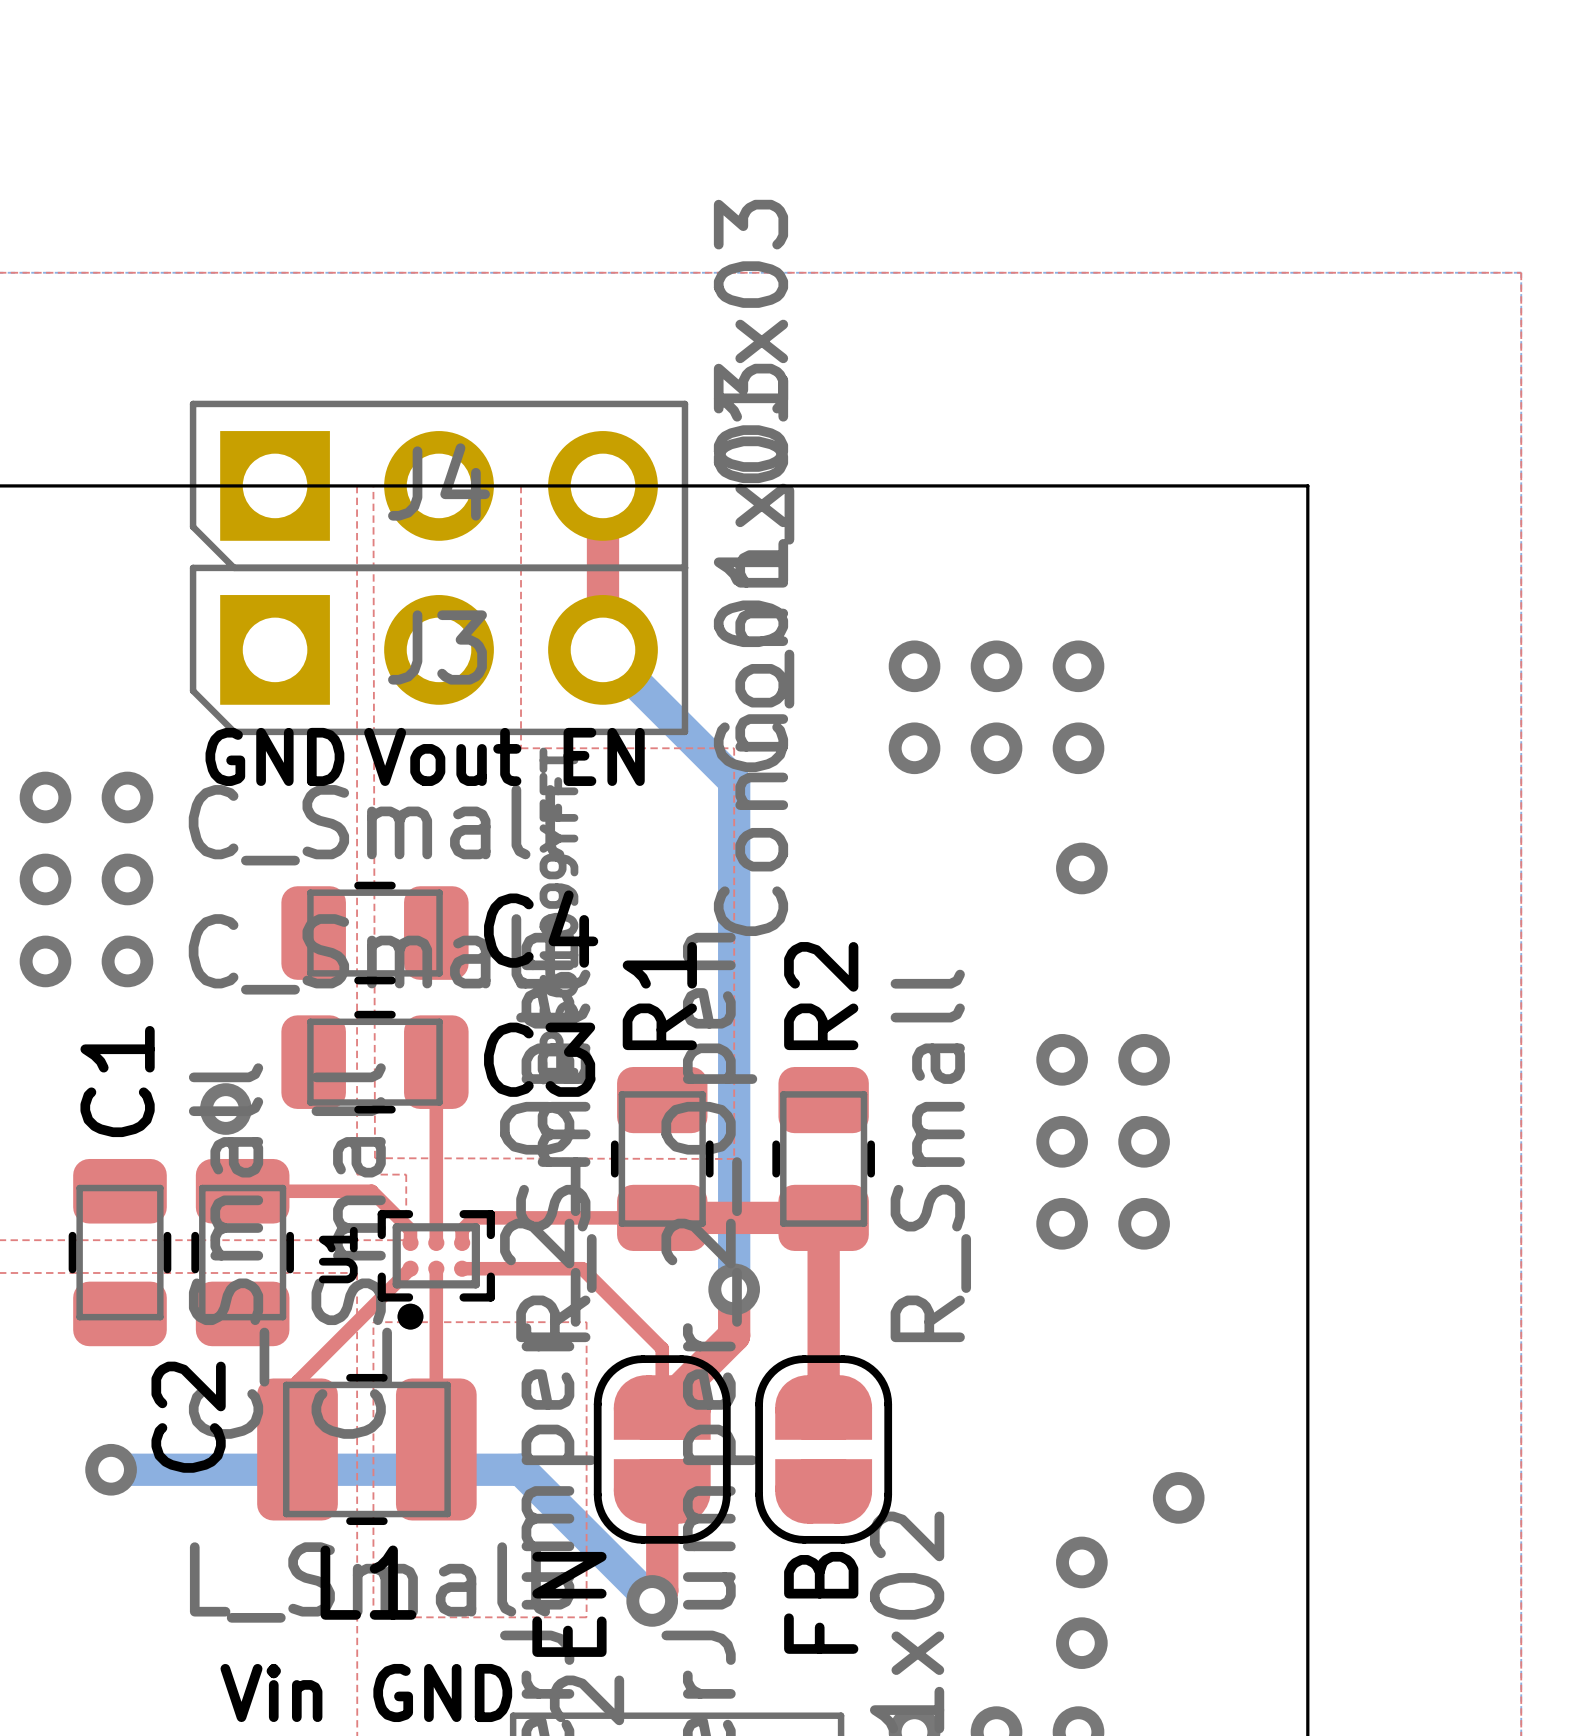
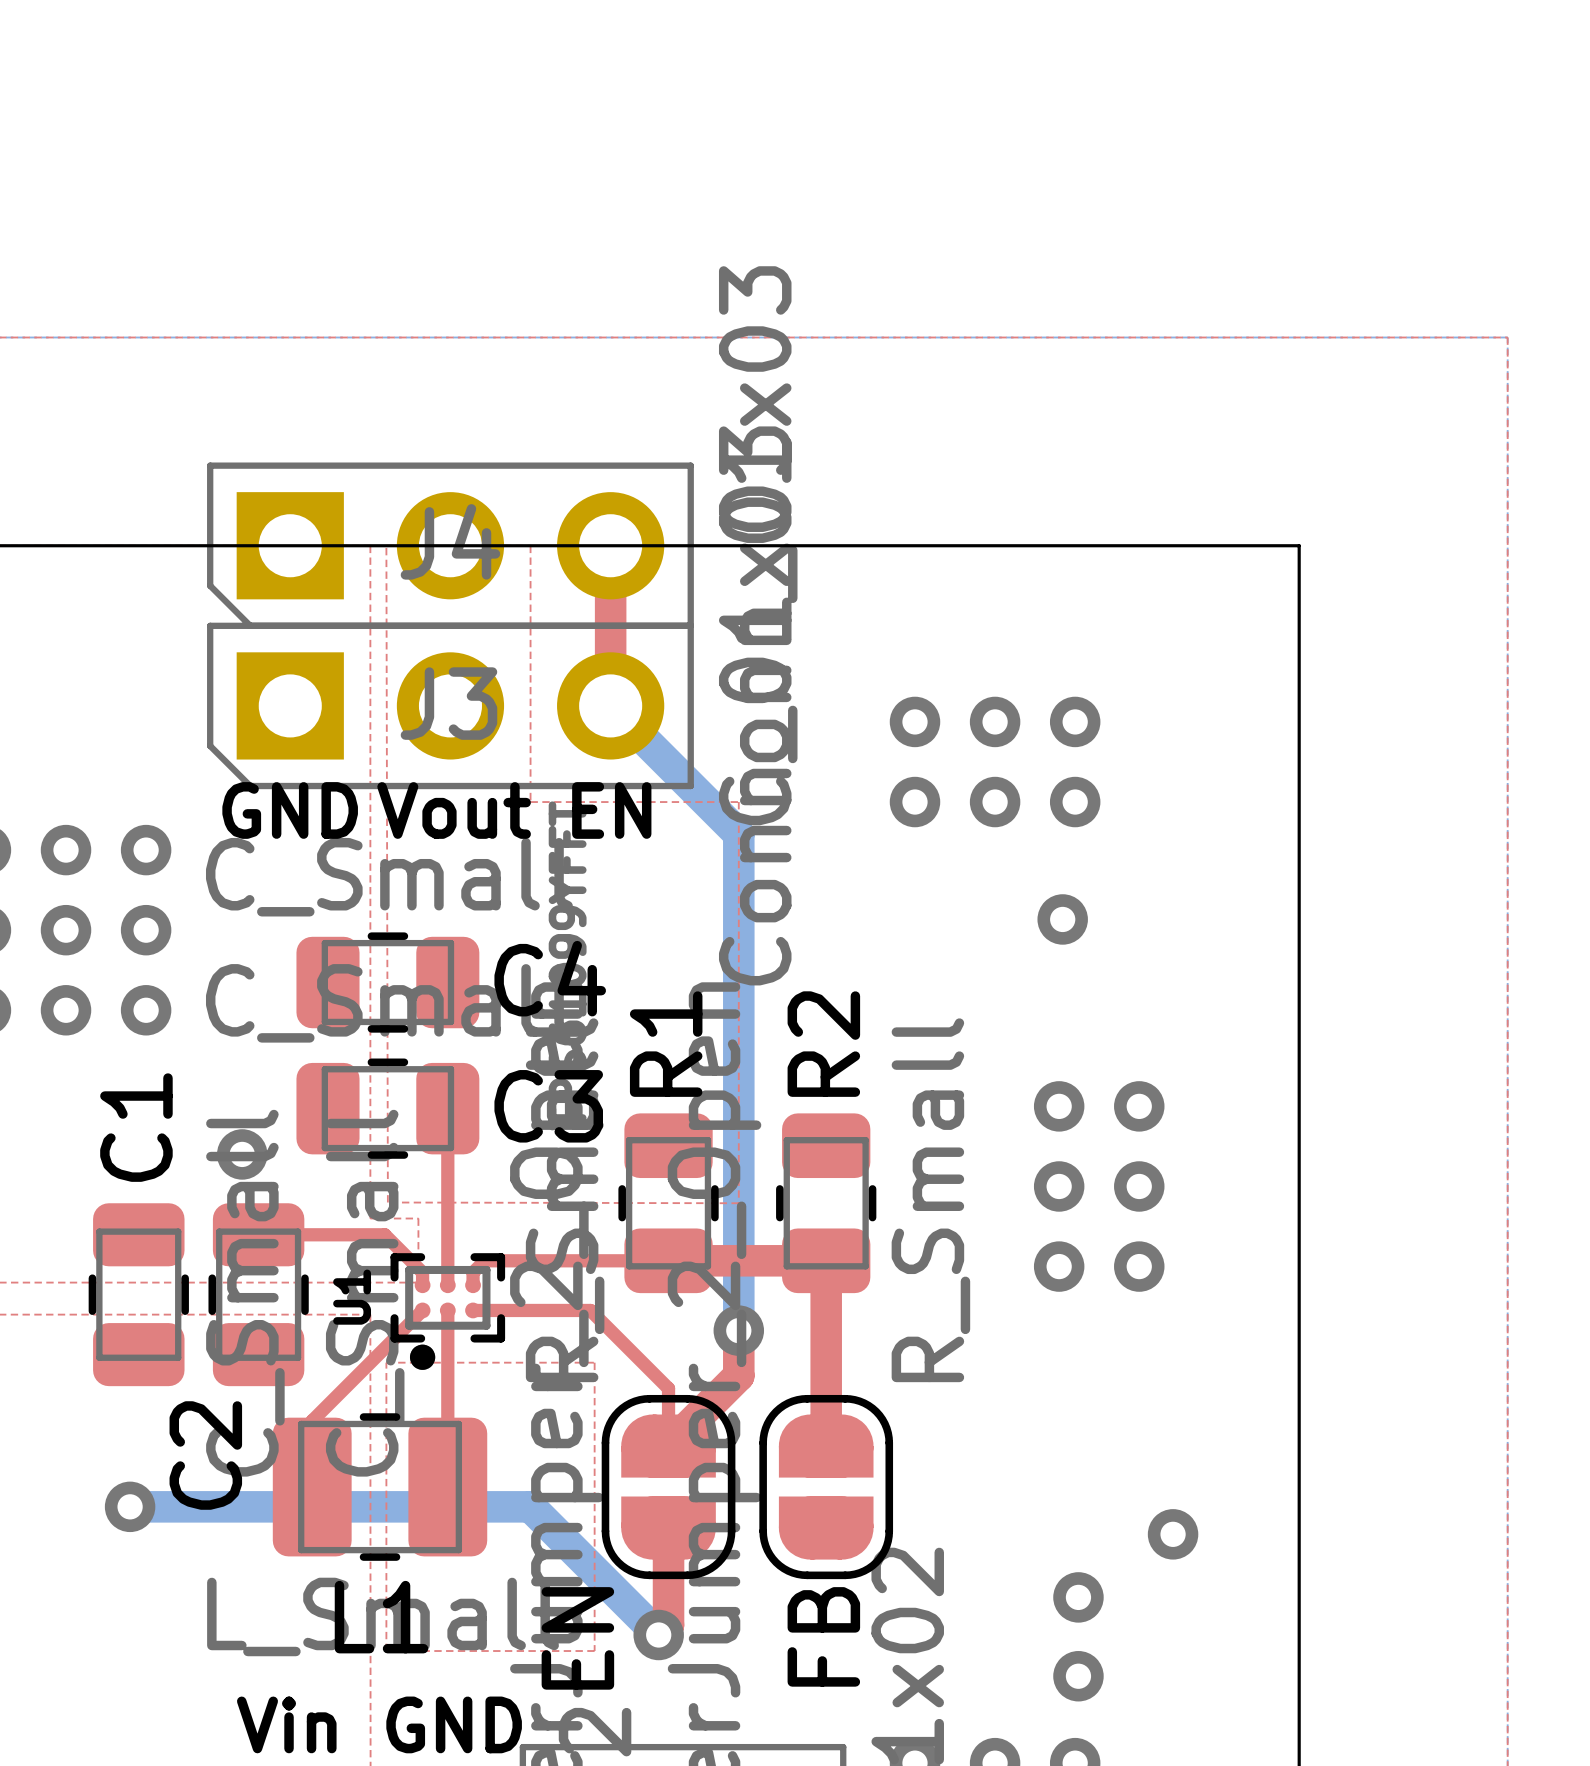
via position: (1081, 868) -> (1062, 919)

